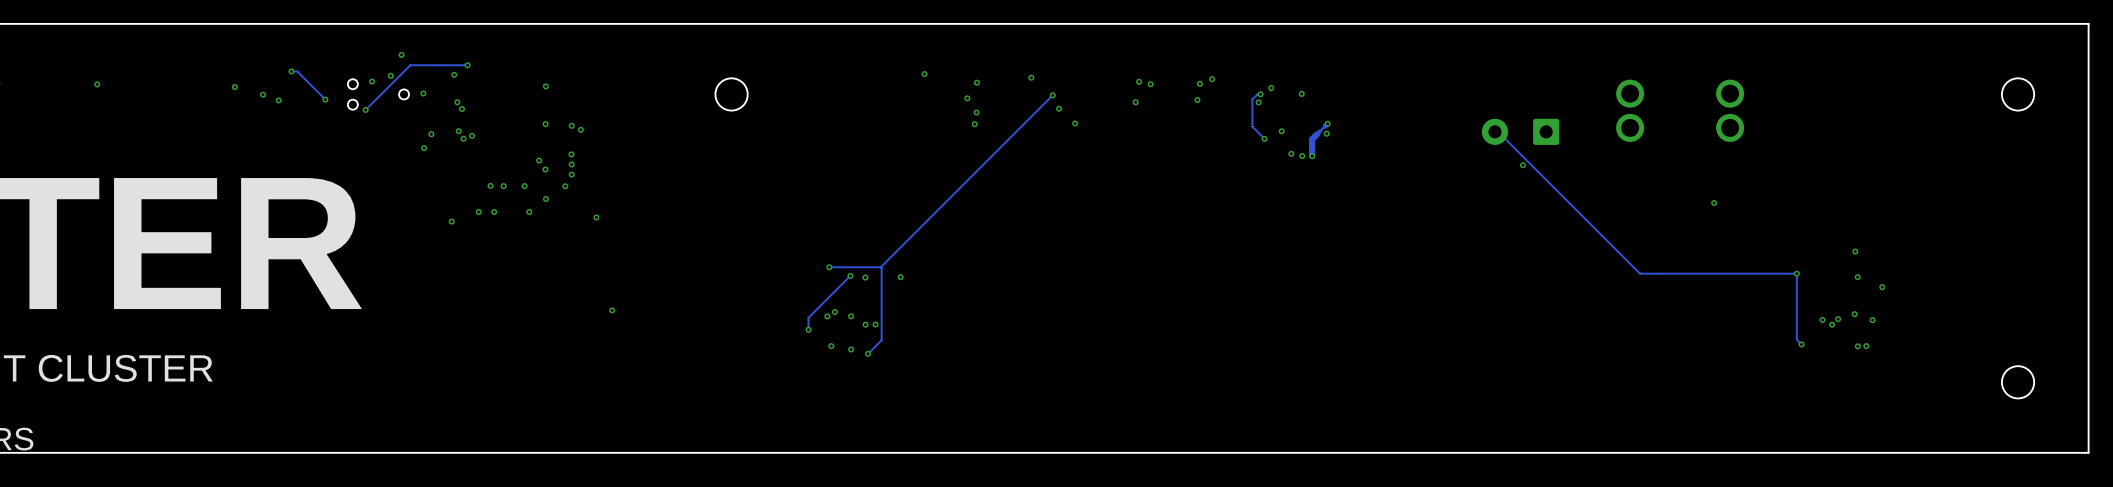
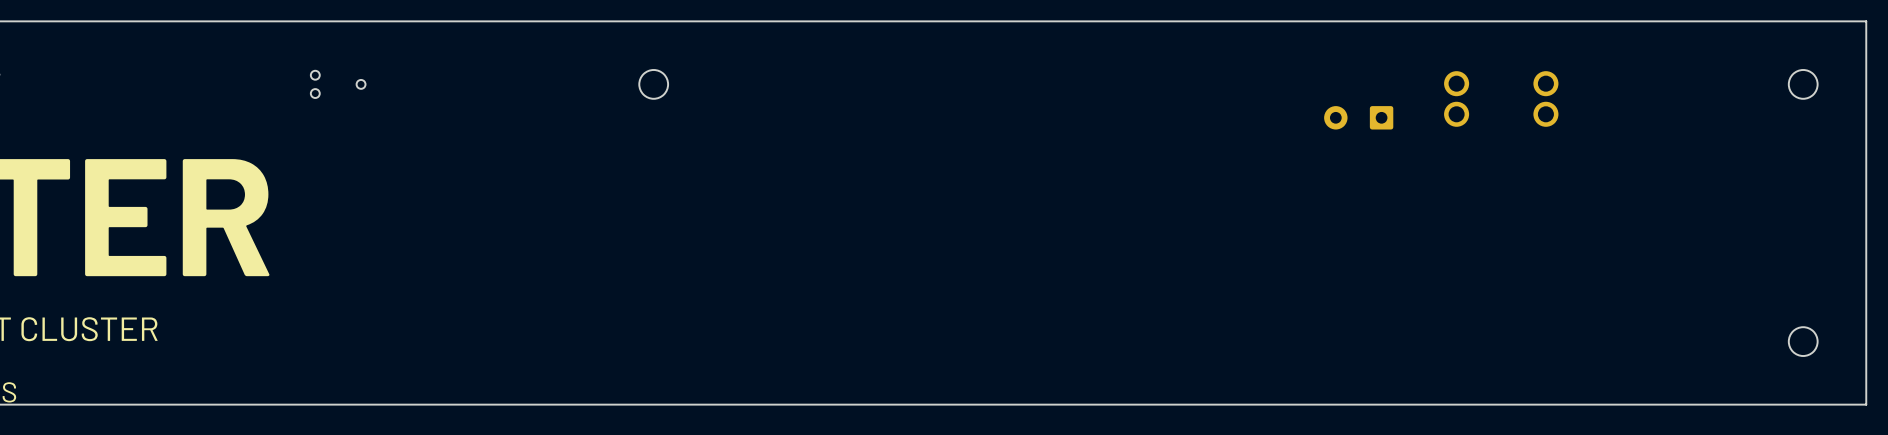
via: (401, 54) -> none
track: (467, 65) (410, 65) (365, 109) -> none
via: (467, 65) -> none
track: (291, 71) (297, 71) (325, 99) -> none
via: (291, 71) -> none
via: (454, 74) -> none
via: (924, 74) -> none
via: (390, 75) -> none
via: (1031, 77) -> none
via: (1212, 79) -> none
via: (372, 81) -> none
via: (1139, 81) -> none
via: (976, 82) -> none
via: (1199, 83) -> none
via: (97, 84) -> none
via: (1150, 84) -> none
via: (545, 86) -> none
via: (234, 87) -> none
via: (1271, 88) -> none
via: (423, 93) -> none
via: (1301, 93) -> none
via: (263, 94) -> none
track: (1260, 94) (1257, 94) (1252, 99) (1252, 126) (1264, 138) -> none
via: (1260, 94) -> none
track: (1052, 95) (880, 267) -> none
via: (1052, 95) -> none
via: (967, 98) -> none
via: (325, 99) -> none
via: (278, 100) -> none
via: (1197, 100) -> none
via: (457, 102) -> none
via: (1135, 102) -> none
via: (1258, 102) -> none
via: (1059, 108) -> none
via: (365, 109) -> none
via: (462, 109) -> none
via: (976, 112) -> none
via: (1075, 123) -> none
track: (1327, 123) (1312, 139) (1312, 156) -> none
via: (1327, 123) -> none
via: (545, 124) -> none
via: (974, 124) -> none
via: (571, 125) -> none
via: (580, 129) -> none
via: (458, 131) -> none
via: (1281, 131) -> none
track: (1494, 131) (1498, 131) (1640, 273) (1796, 273) (1796, 339) (1801, 344) -> none
via: (1326, 133) -> none
via: (431, 134) -> none
via: (471, 135) -> none
via: (463, 138) -> none
via: (1264, 138) -> none
via: (424, 148) -> none
via: (1291, 153) -> none
via: (571, 154) -> none
via: (1302, 156) -> none
via: (1312, 156) -> none
via: (539, 160) -> none
via: (571, 164) -> none
via: (1522, 165) -> none
via: (545, 169) -> none
via: (571, 174) -> none
via: (490, 185) -> none
via: (503, 186) -> none
via: (524, 186) -> none
via: (565, 186) -> none
via: (545, 199) -> none
via: (1714, 203) -> none
via: (478, 212) -> none
via: (494, 212) -> none
via: (529, 212) -> none
via: (596, 217) -> none
via: (451, 221) -> none
via: (1855, 251) -> none
via: (829, 267) -> none
track: (880, 267) (829, 267) -> none
track: (880, 267) (881, 340) (868, 353) -> none
via: (1796, 273) -> none
track: (850, 275) (808, 317) (808, 329) -> none
via: (850, 275) -> none
via: (865, 277) -> none
via: (900, 277) -> none
via: (1857, 277) -> none
via: (1882, 287) -> none
via: (612, 310) -> none
via: (834, 312) -> none
via: (1854, 314) -> none
via: (827, 316) -> none
via: (851, 316) -> none
via: (1822, 319) -> none
via: (1838, 319) -> none
via: (1872, 320) -> none
via: (865, 324) -> none
via: (875, 324) -> none
via: (1832, 324) -> none
via: (808, 329) -> none
via: (1801, 344) -> none
via: (831, 346) -> none
via: (1857, 346) -> none
via: (1866, 346) -> none
via: (851, 349) -> none
via: (868, 353) -> none

